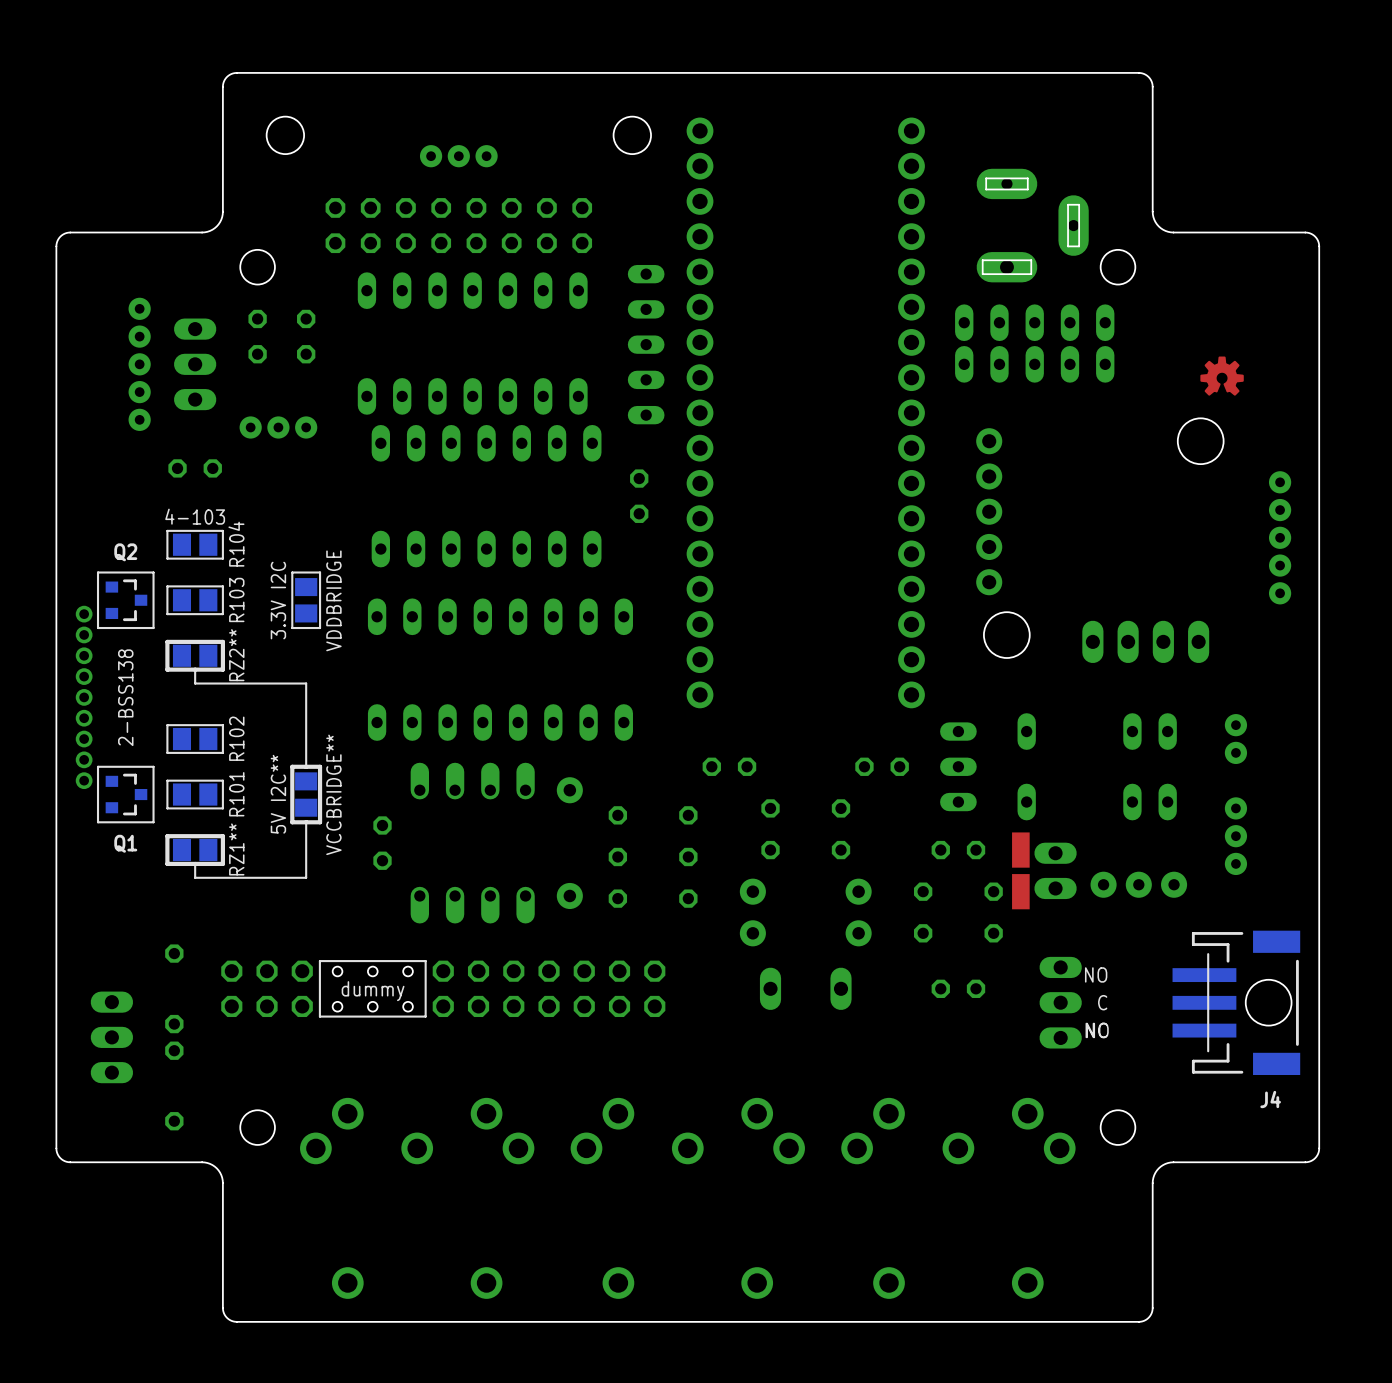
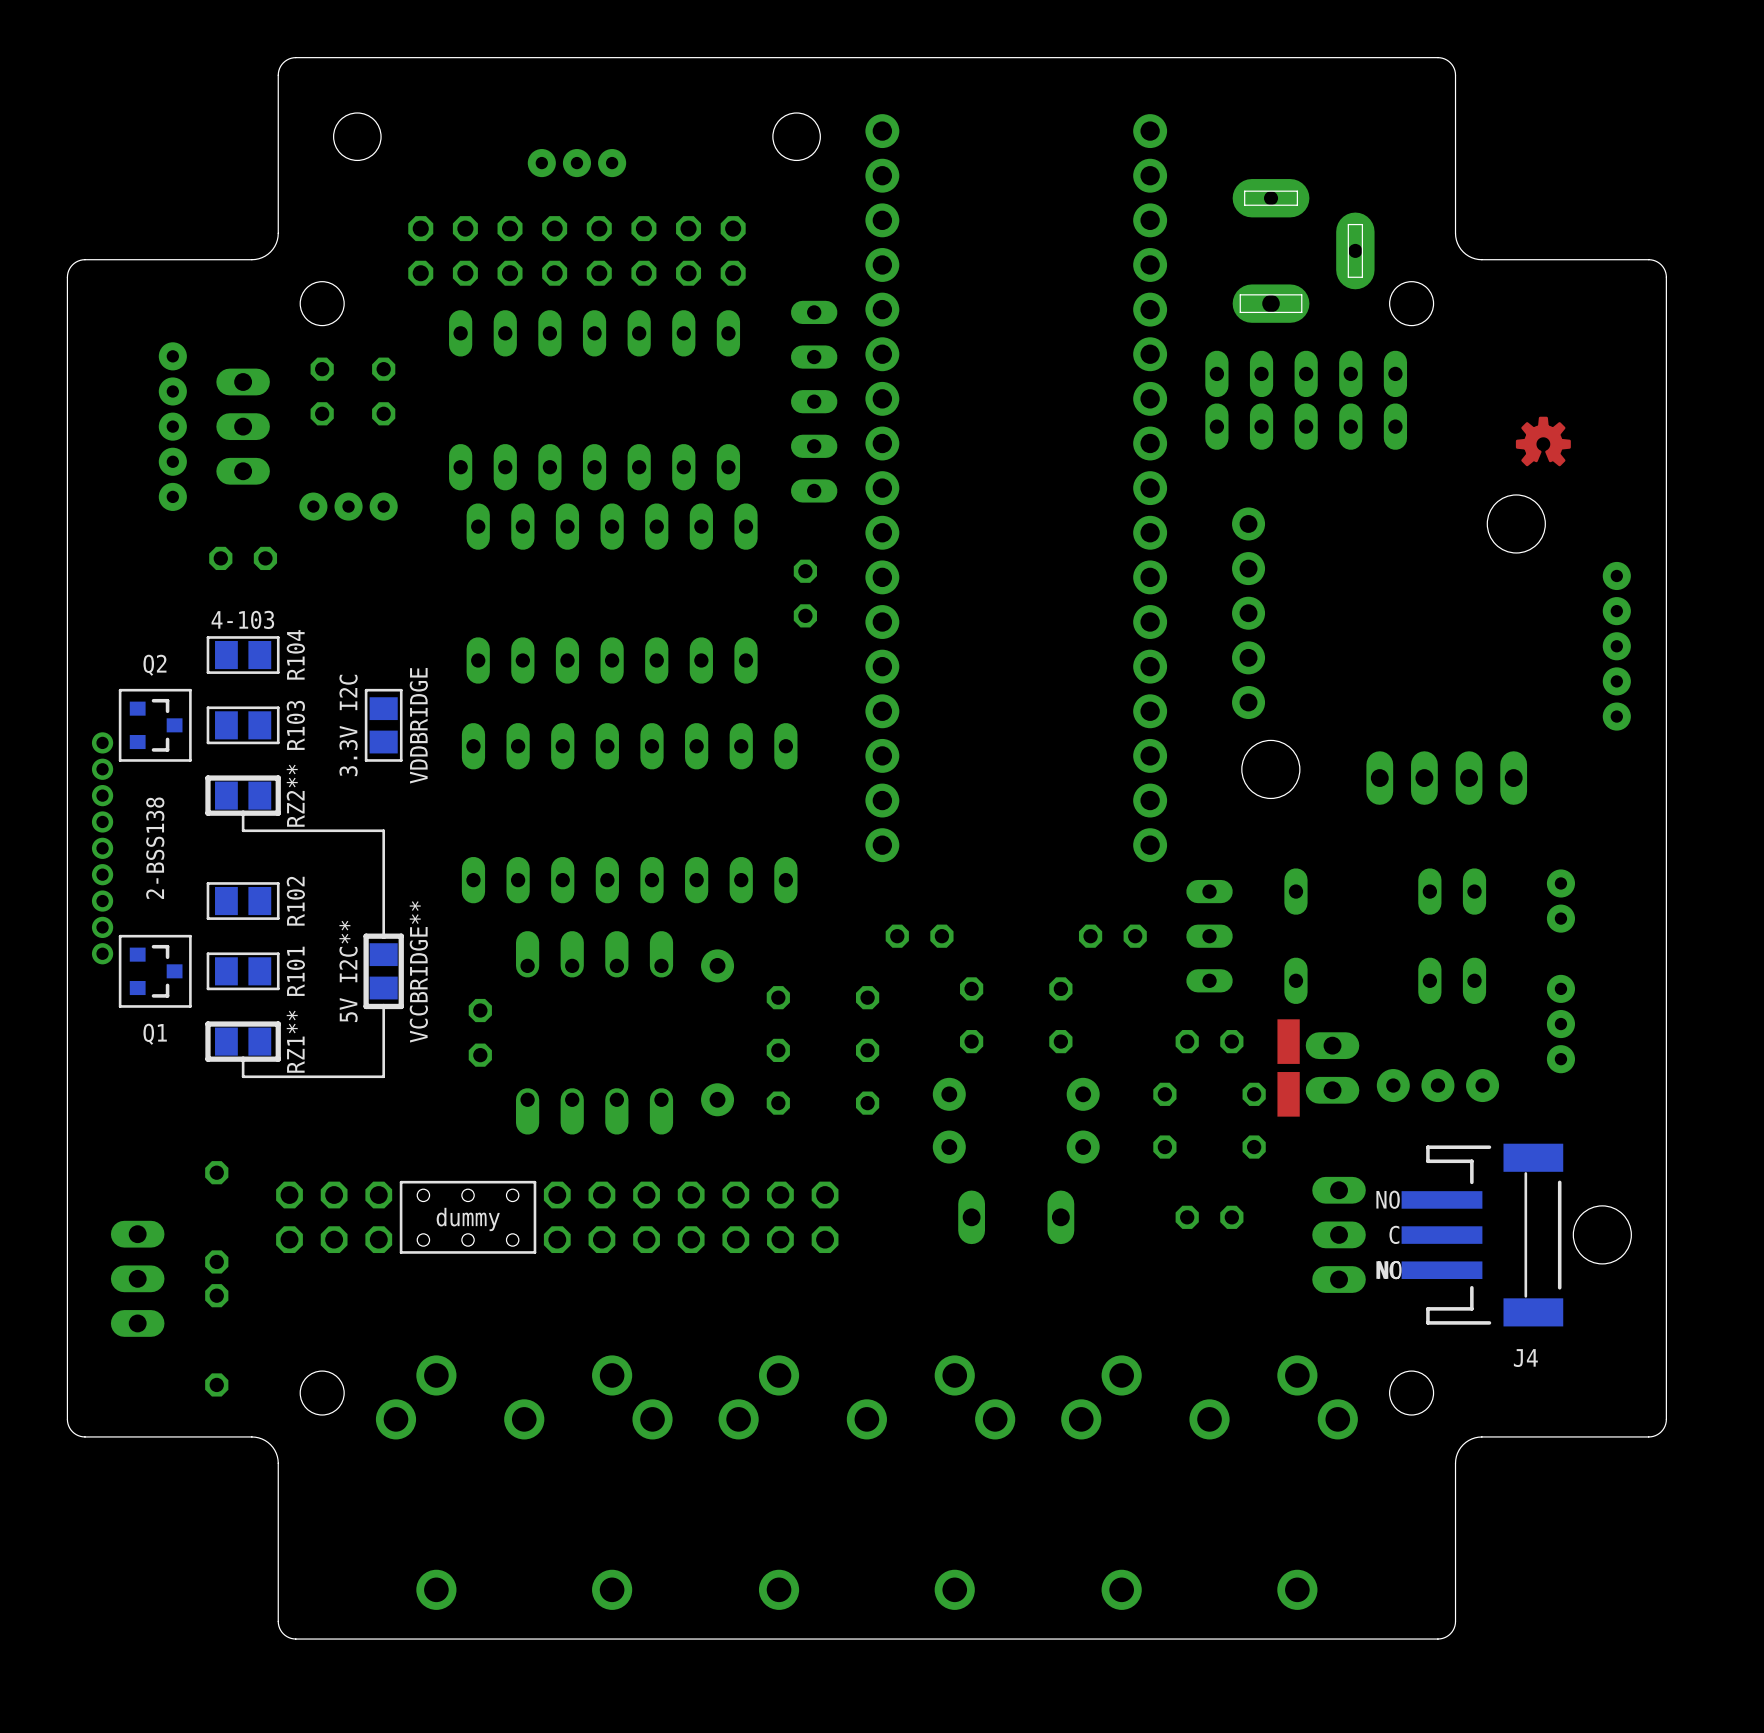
J4 position: (1236, 1002) -> (1482, 1235)

